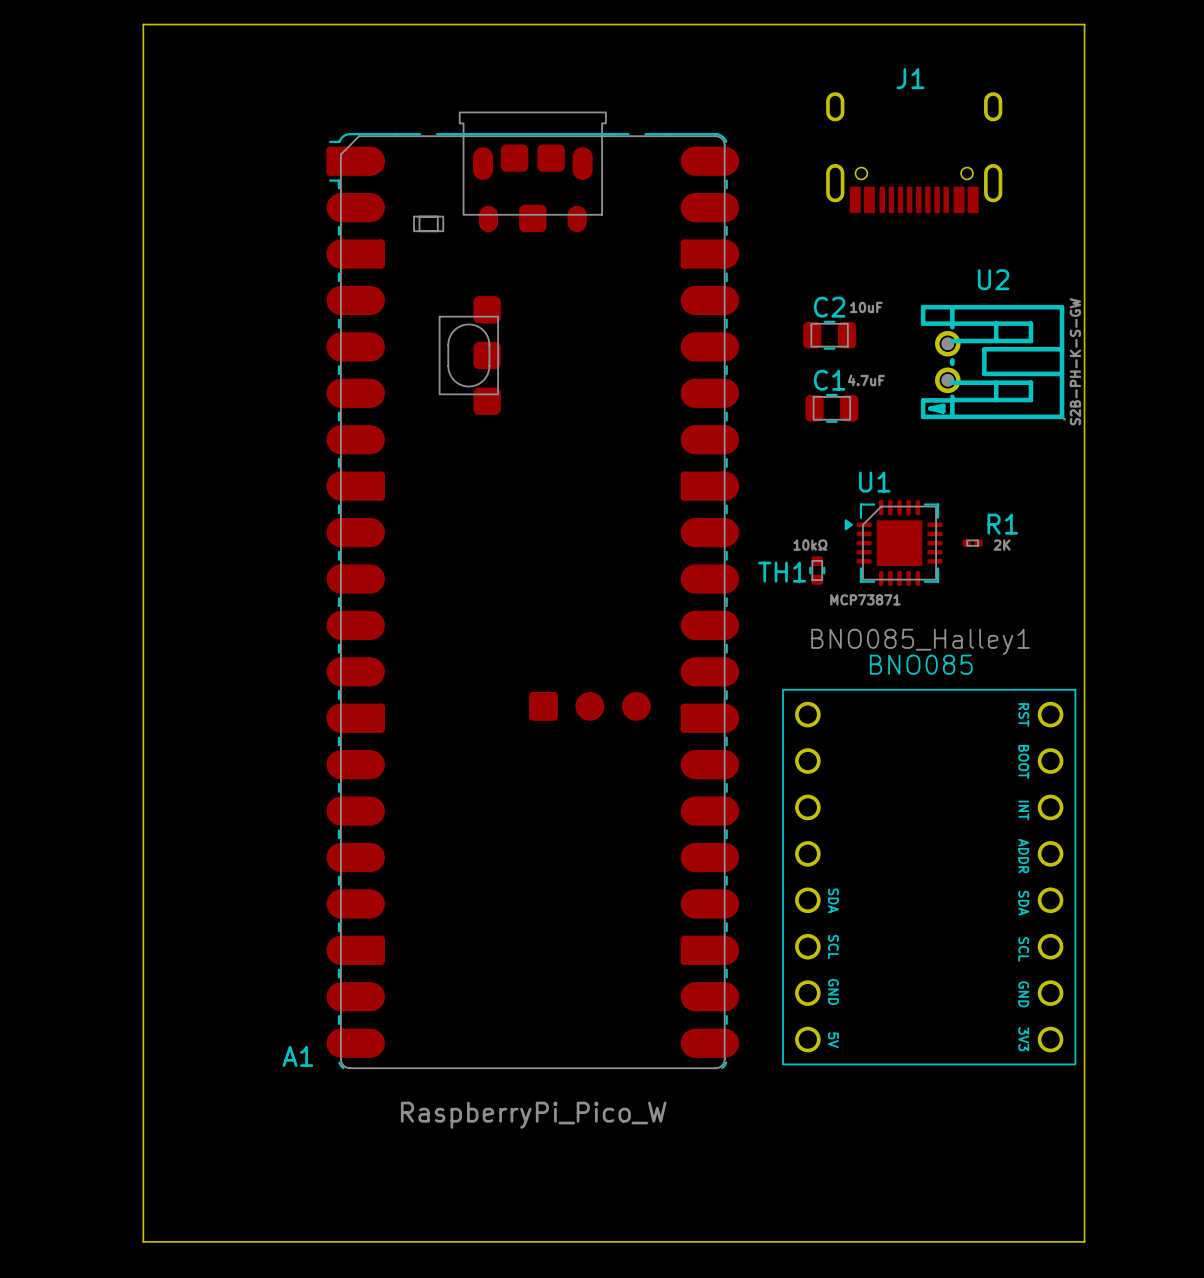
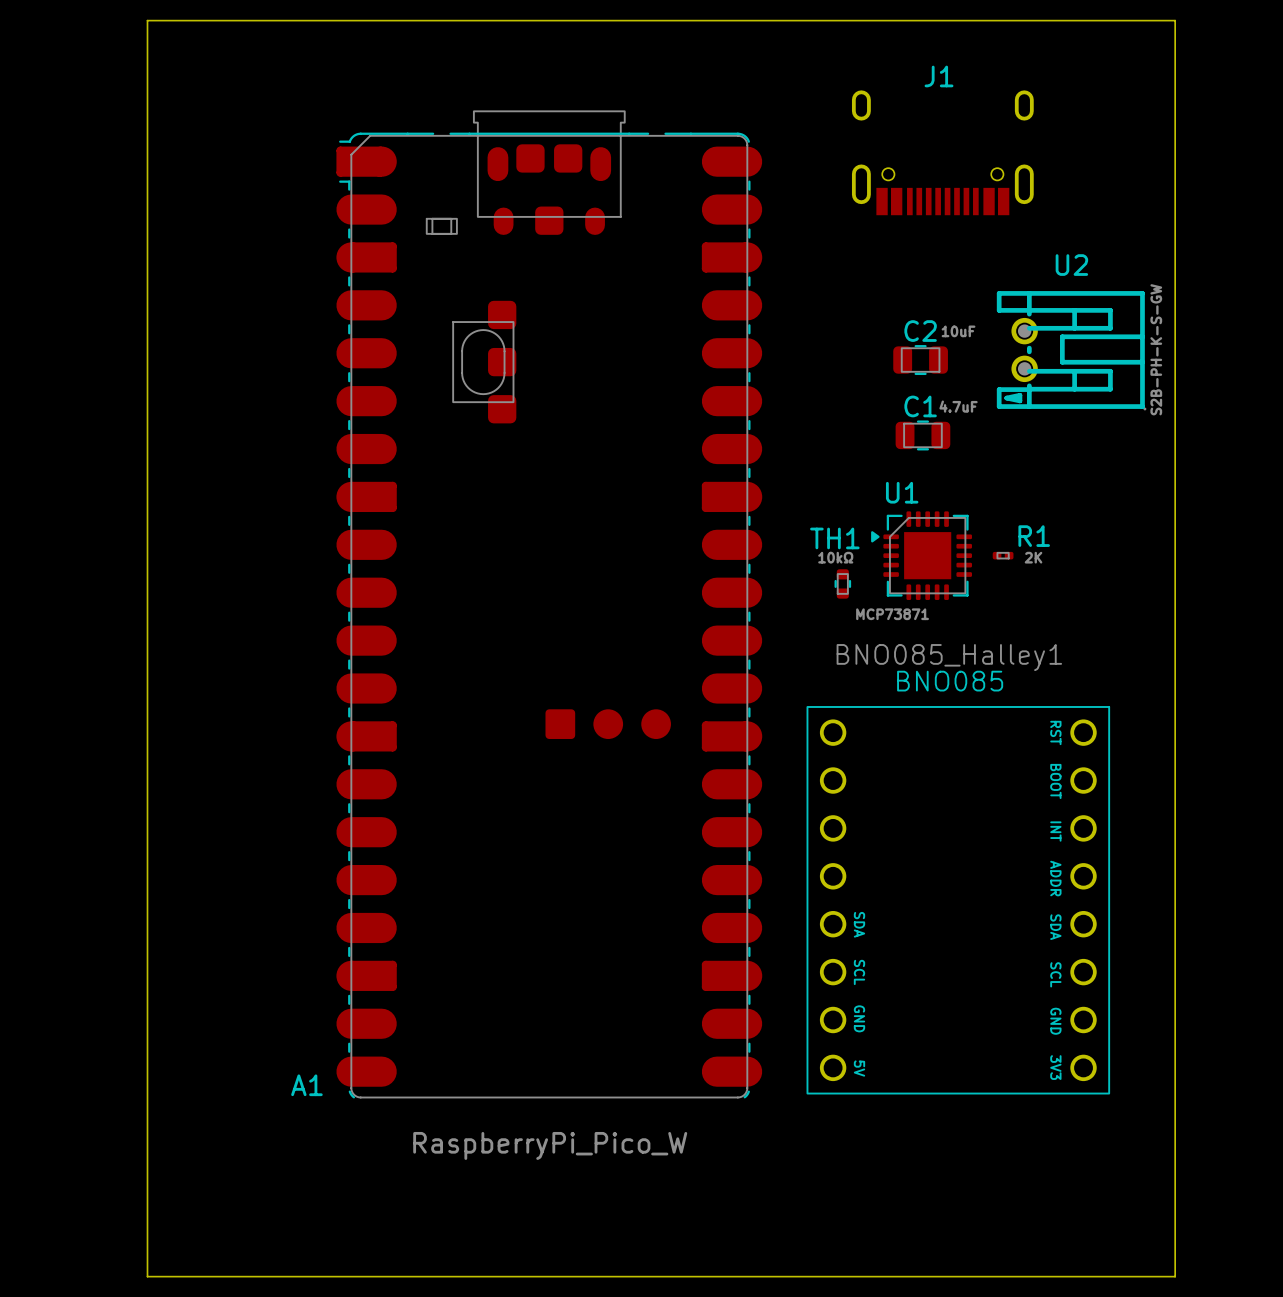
board edge: (1084, 24) (1084, 1241) -> (1118, 20) (1175, 20) (1175, 1276) (1118, 1276)
C2 position: (829, 335) -> (920, 360)
U2 position: (993, 362) -> (1071, 350)
C1 position: (831, 408) -> (922, 435)
TH1 name position: TH1 (782, 572) -> TH1 (834, 538)

